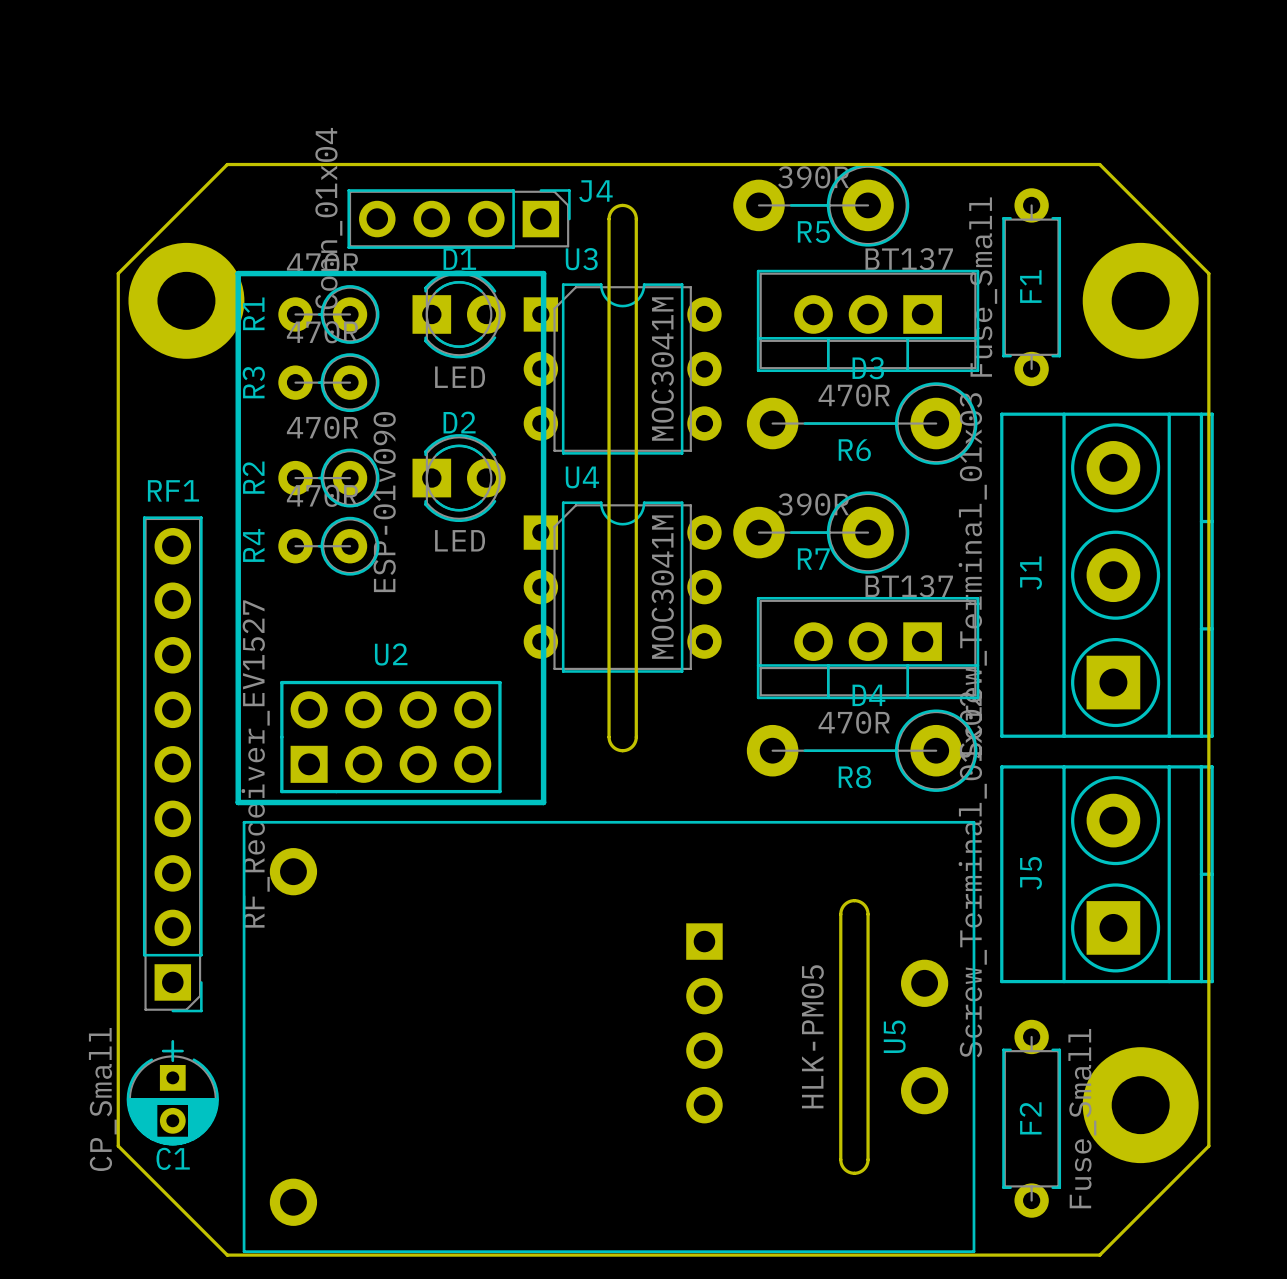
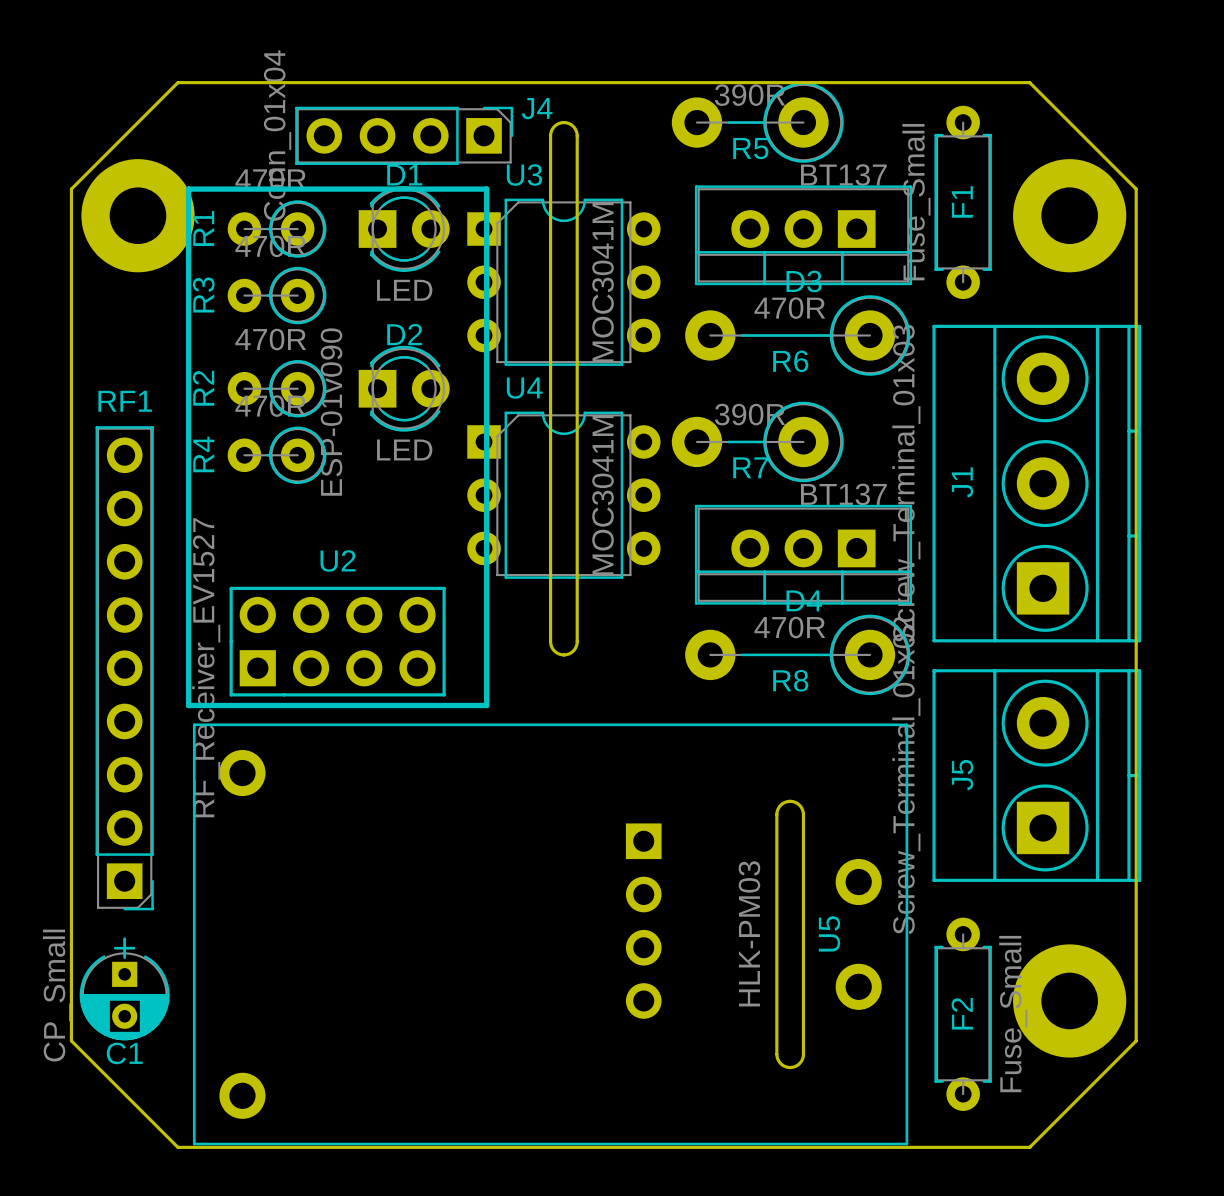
U5 value: HLK-PM05 (812, 1036) -> HLK-PM03 (749, 933)

